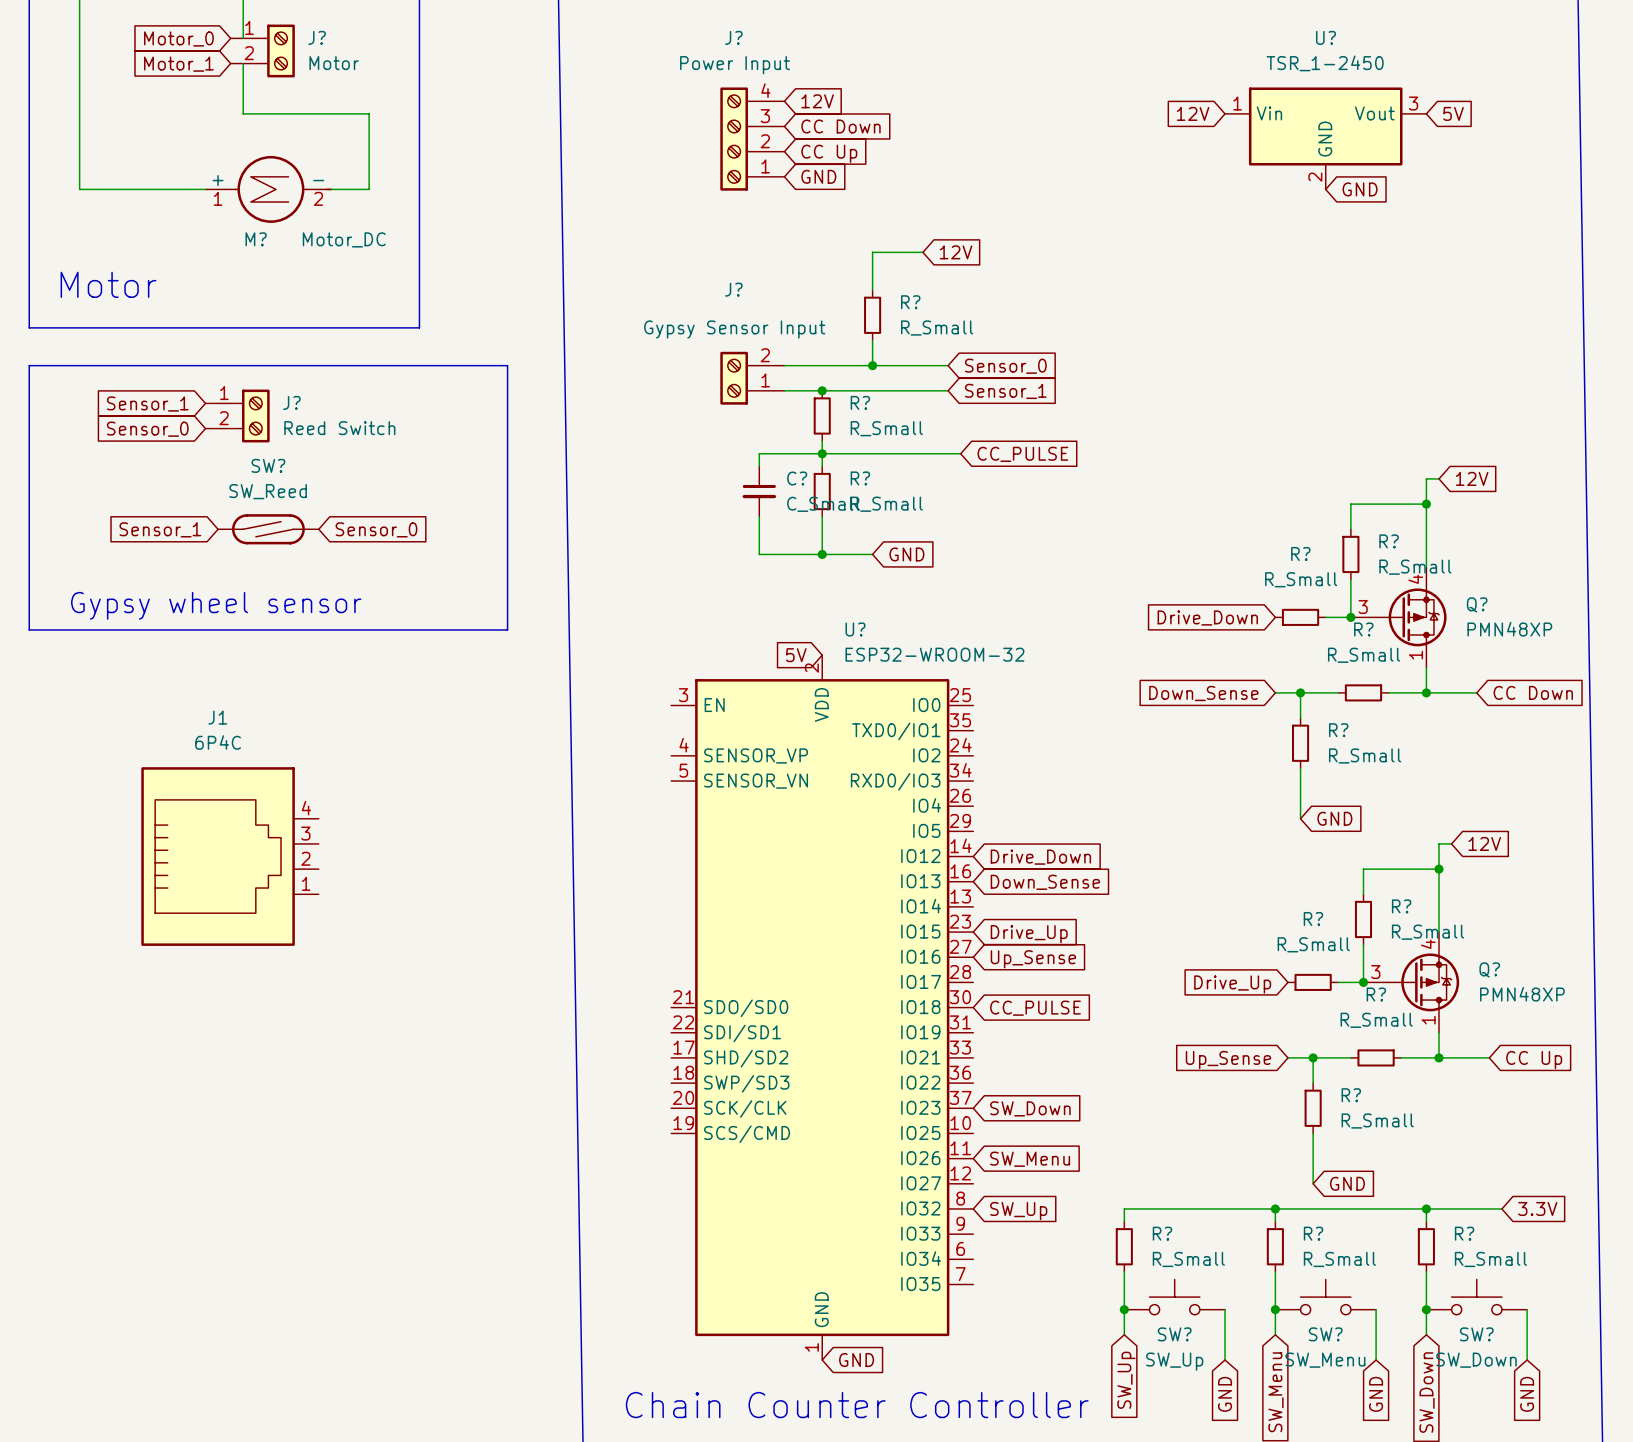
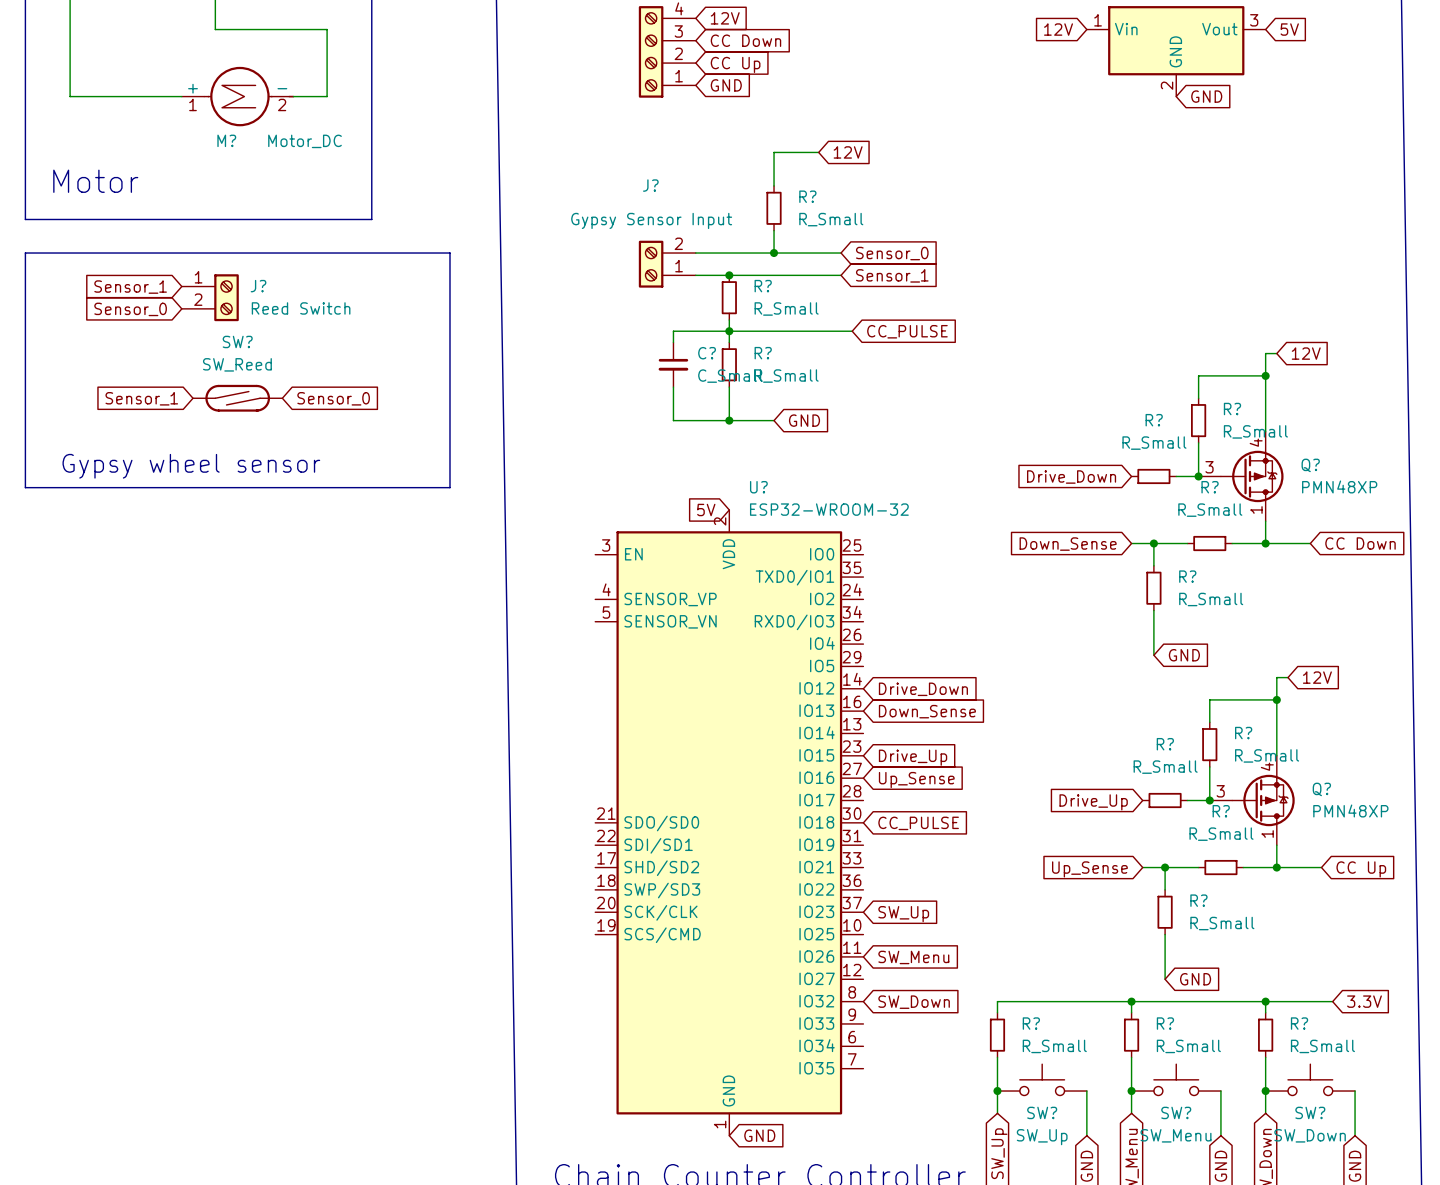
J1: 6P4C (230, 856) -> none
global label: SW_Down (1030, 1108) -> SW_Up (903, 914)
global label: SW_Up (1018, 1211) -> SW_Down (914, 1002)

